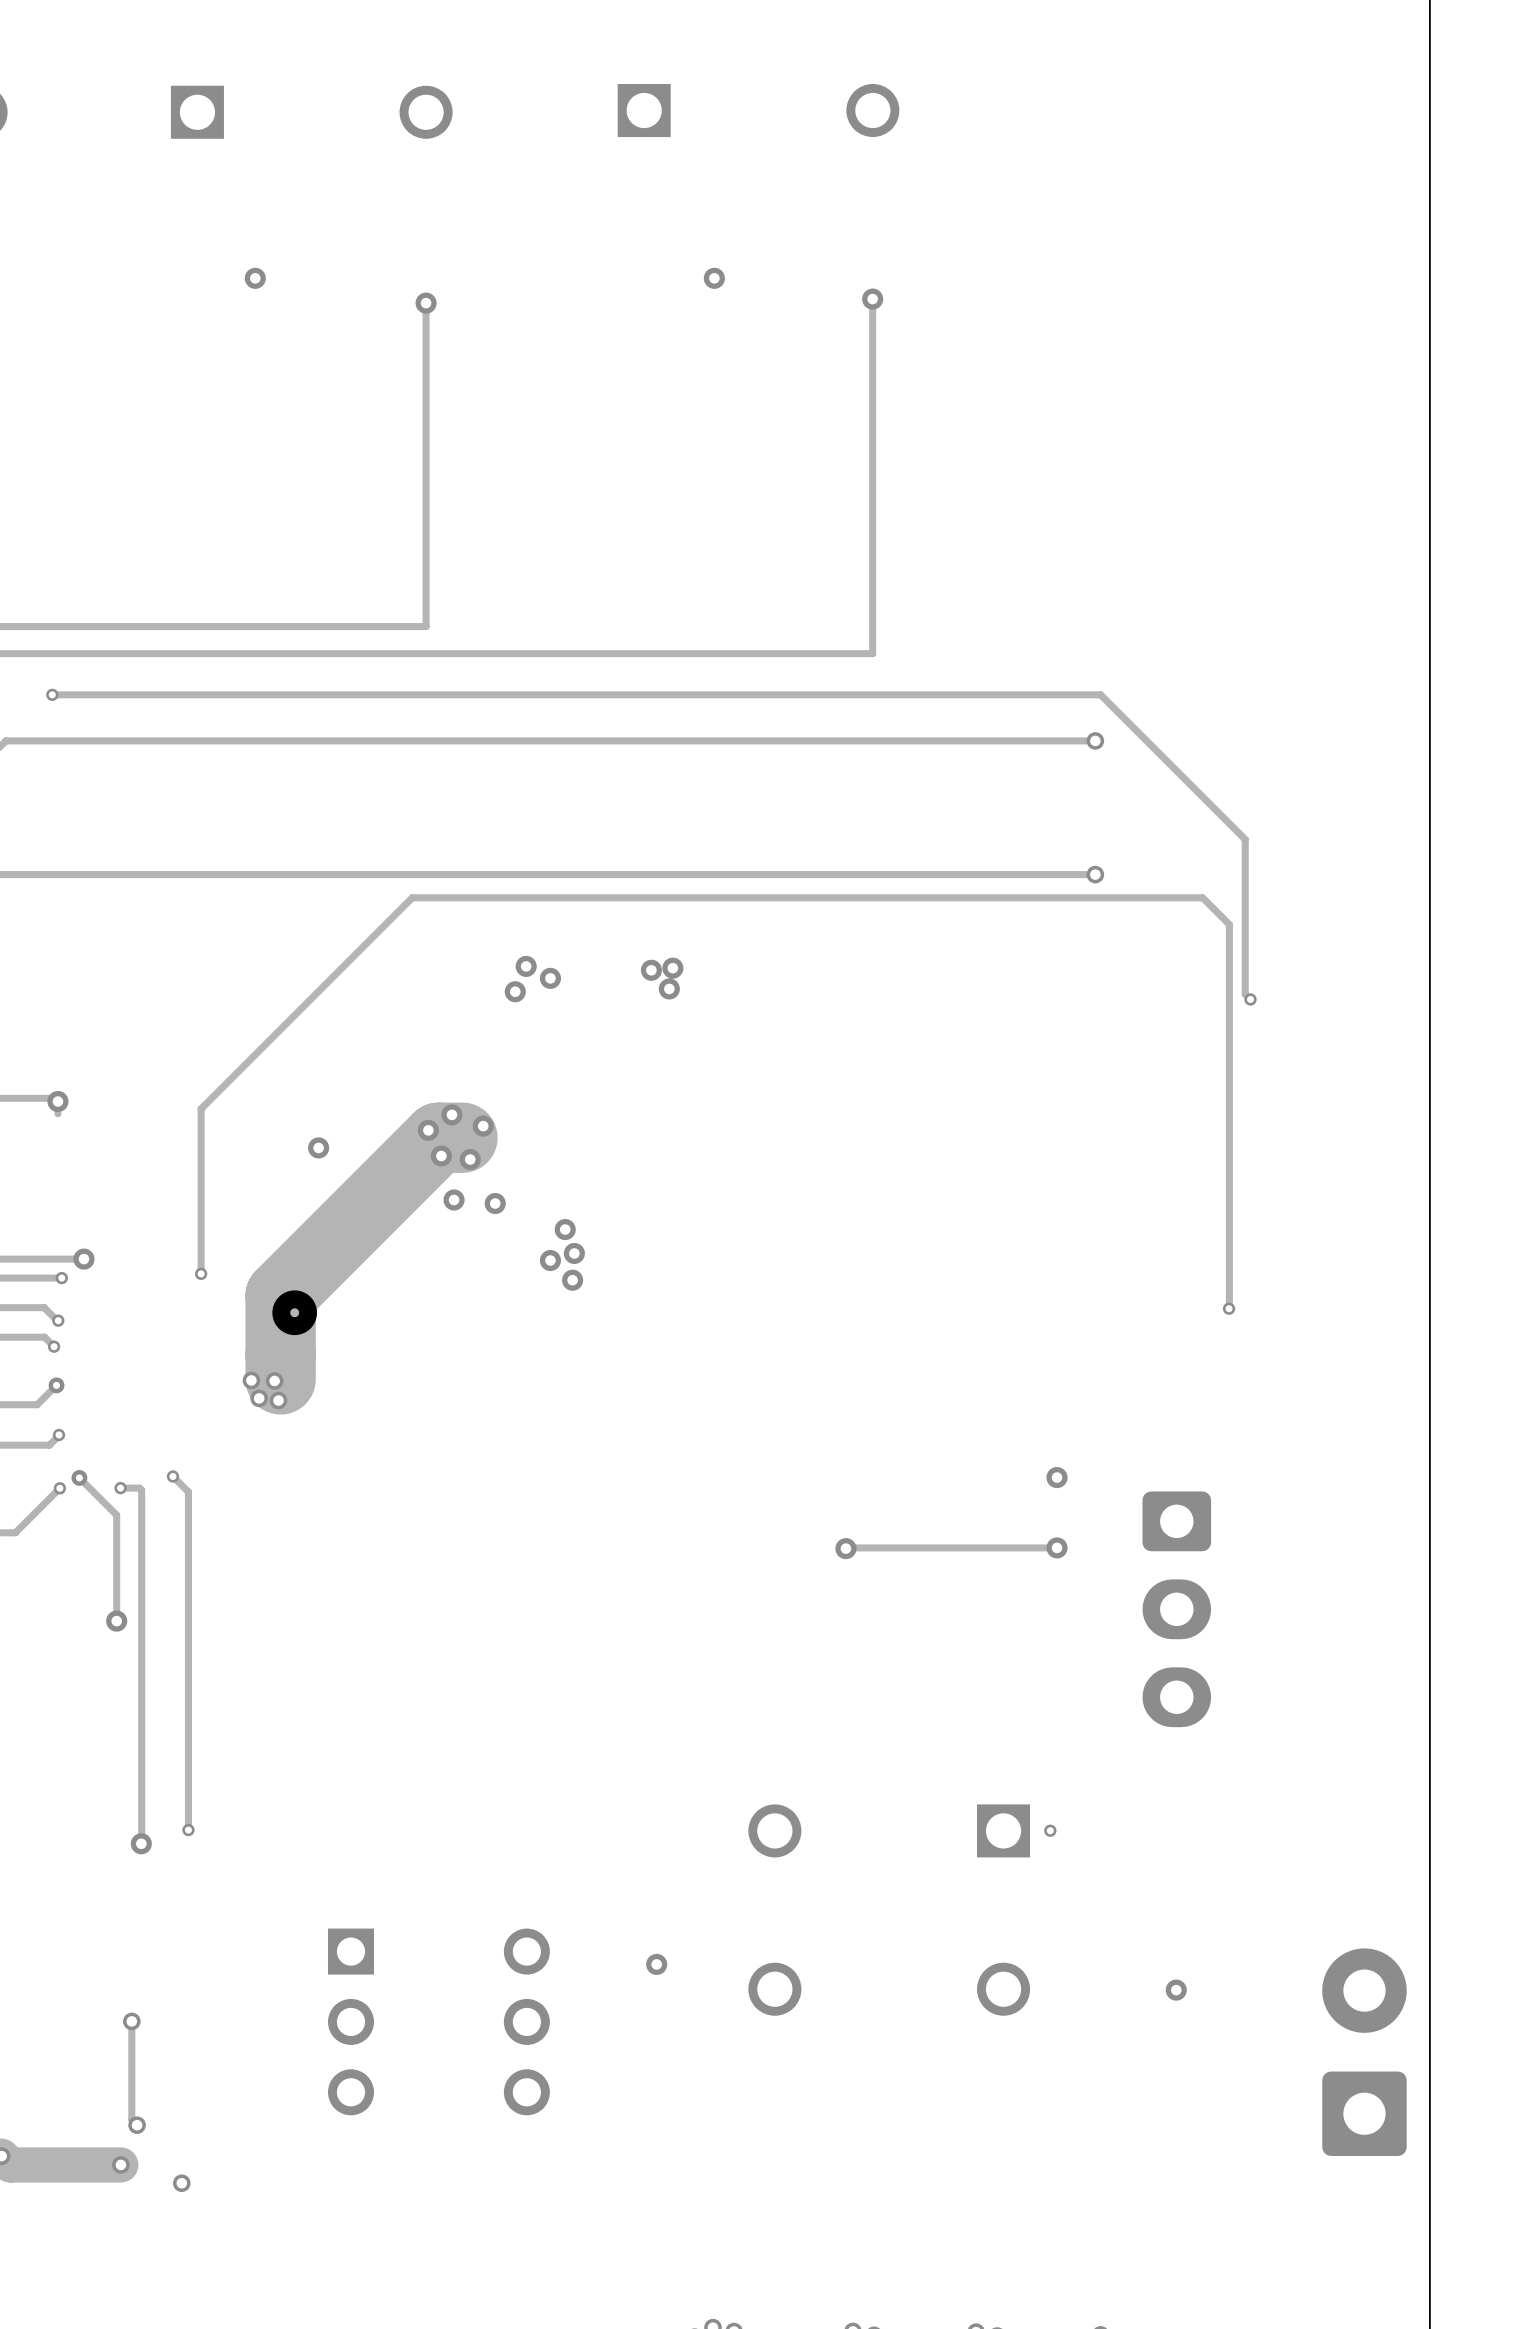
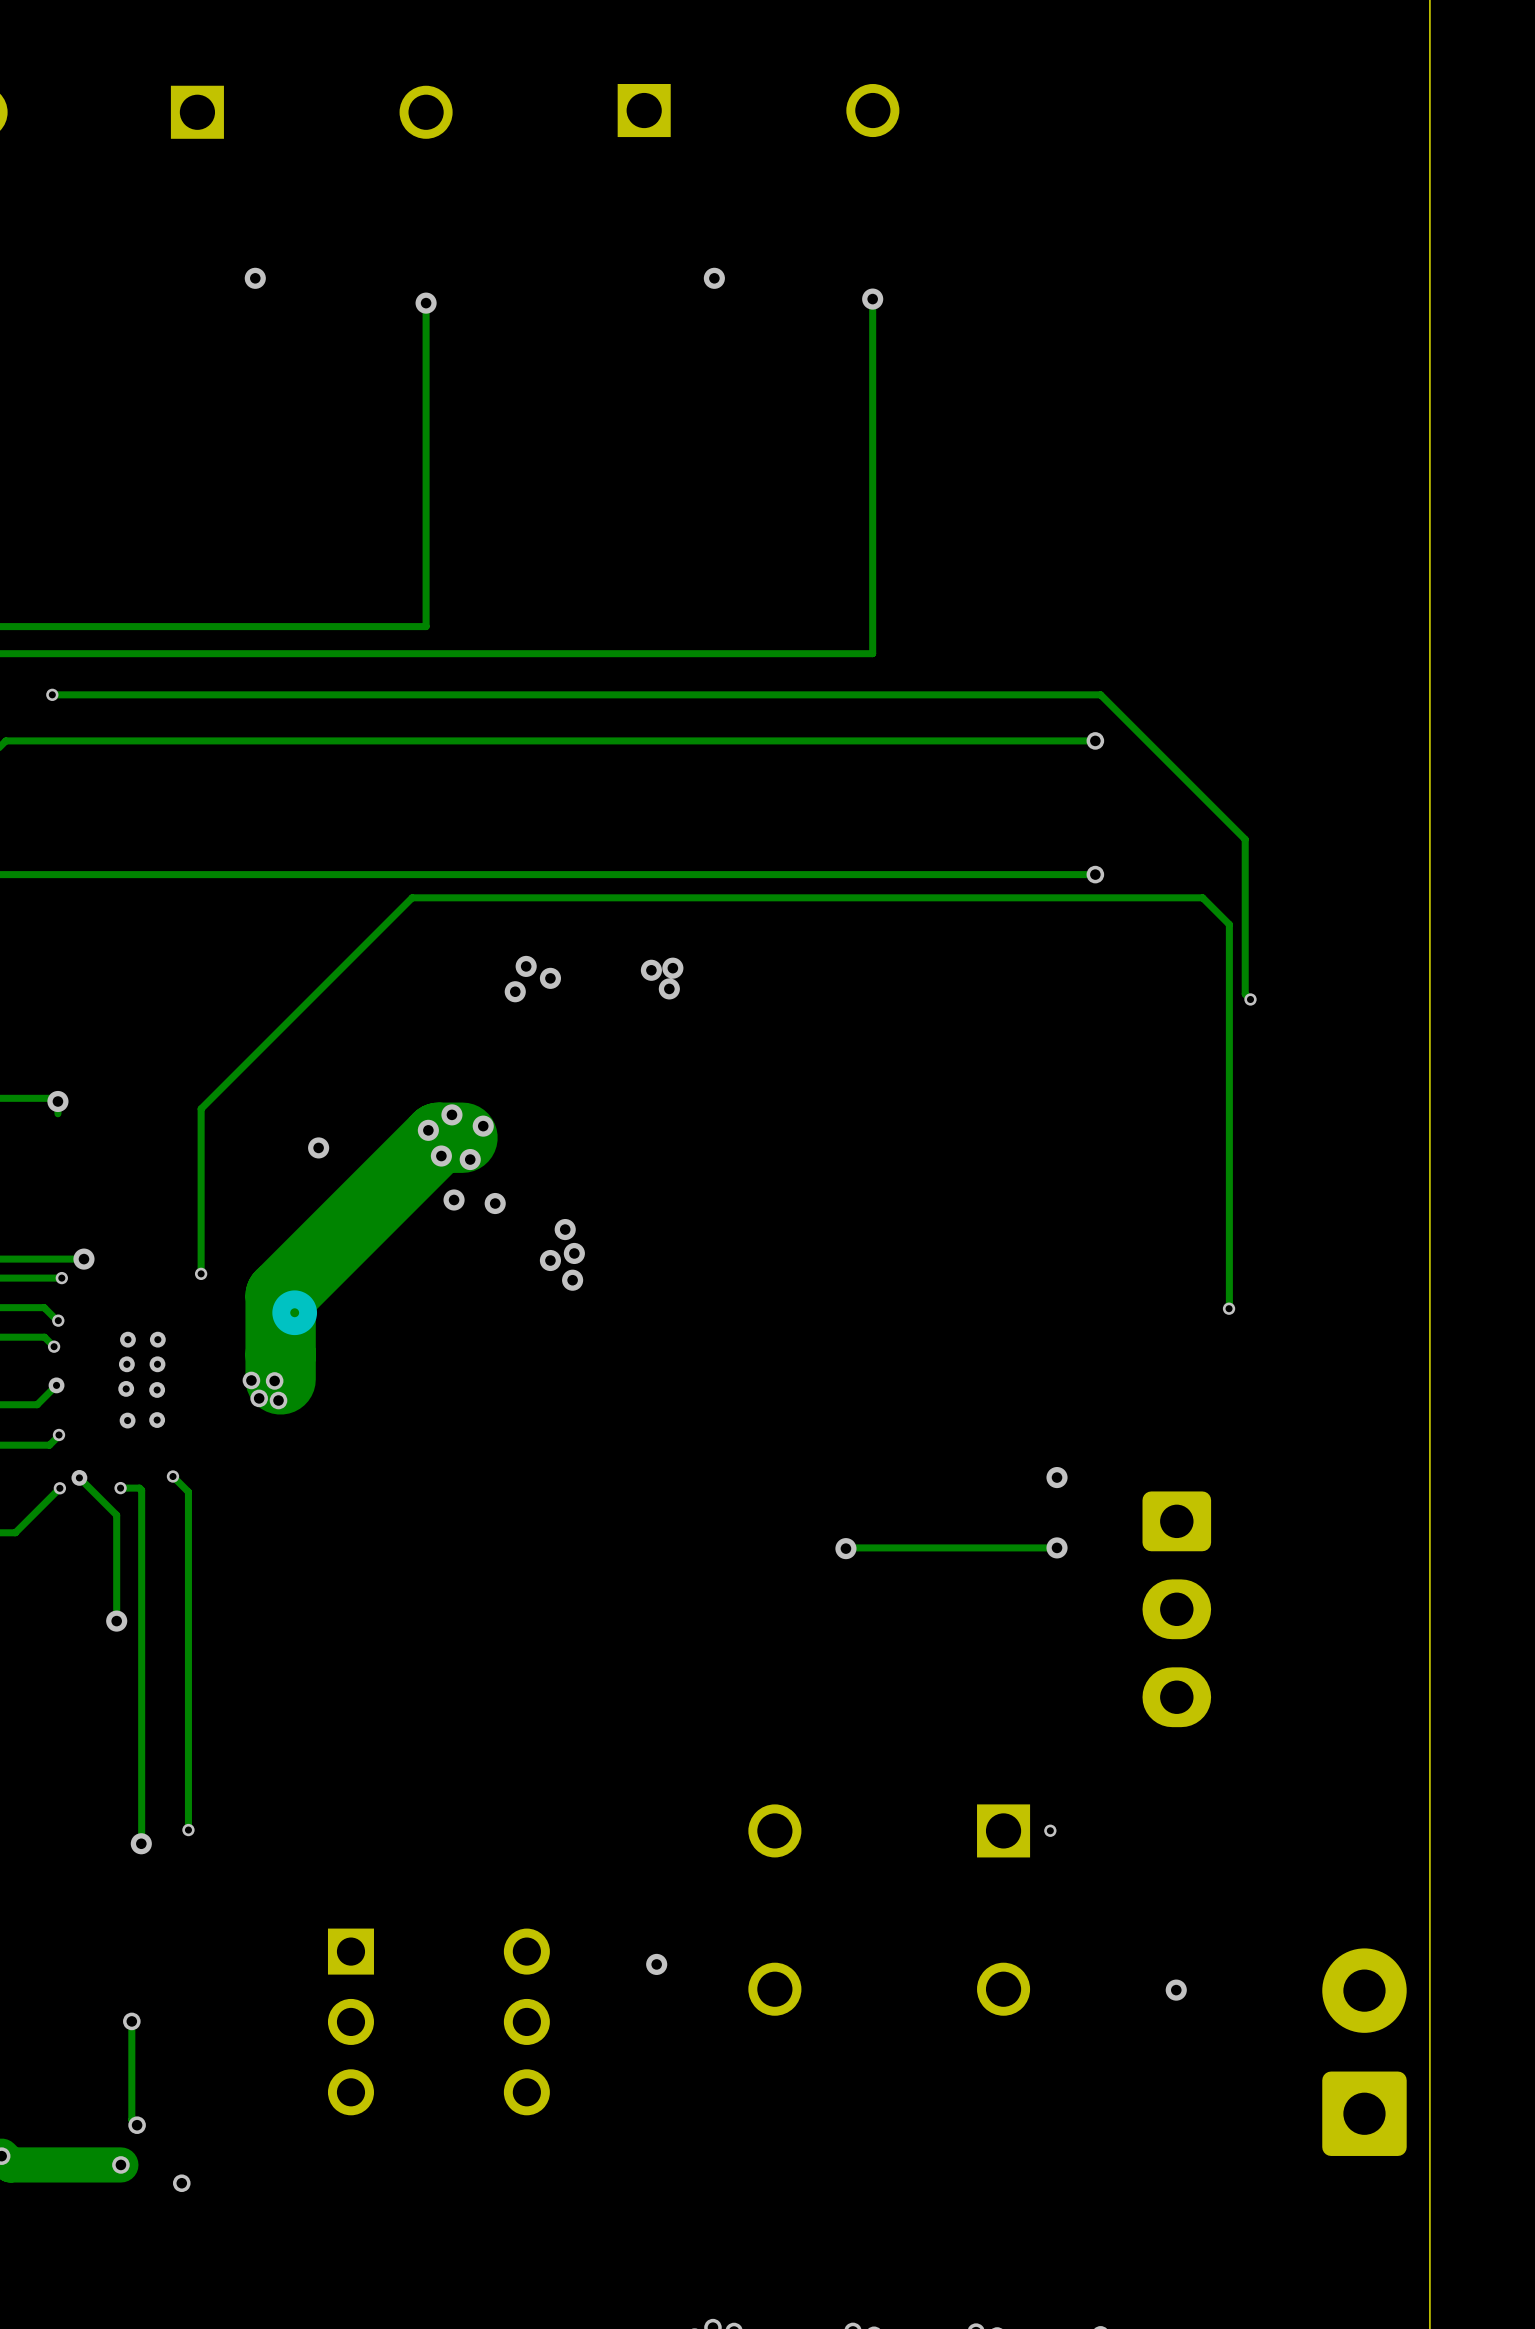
via: none -> (127, 1339)
via: none -> (157, 1339)
via: none -> (126, 1364)
via: none -> (157, 1364)
via: none -> (126, 1388)
via: none -> (157, 1389)
via: none -> (127, 1420)
via: none -> (157, 1420)

